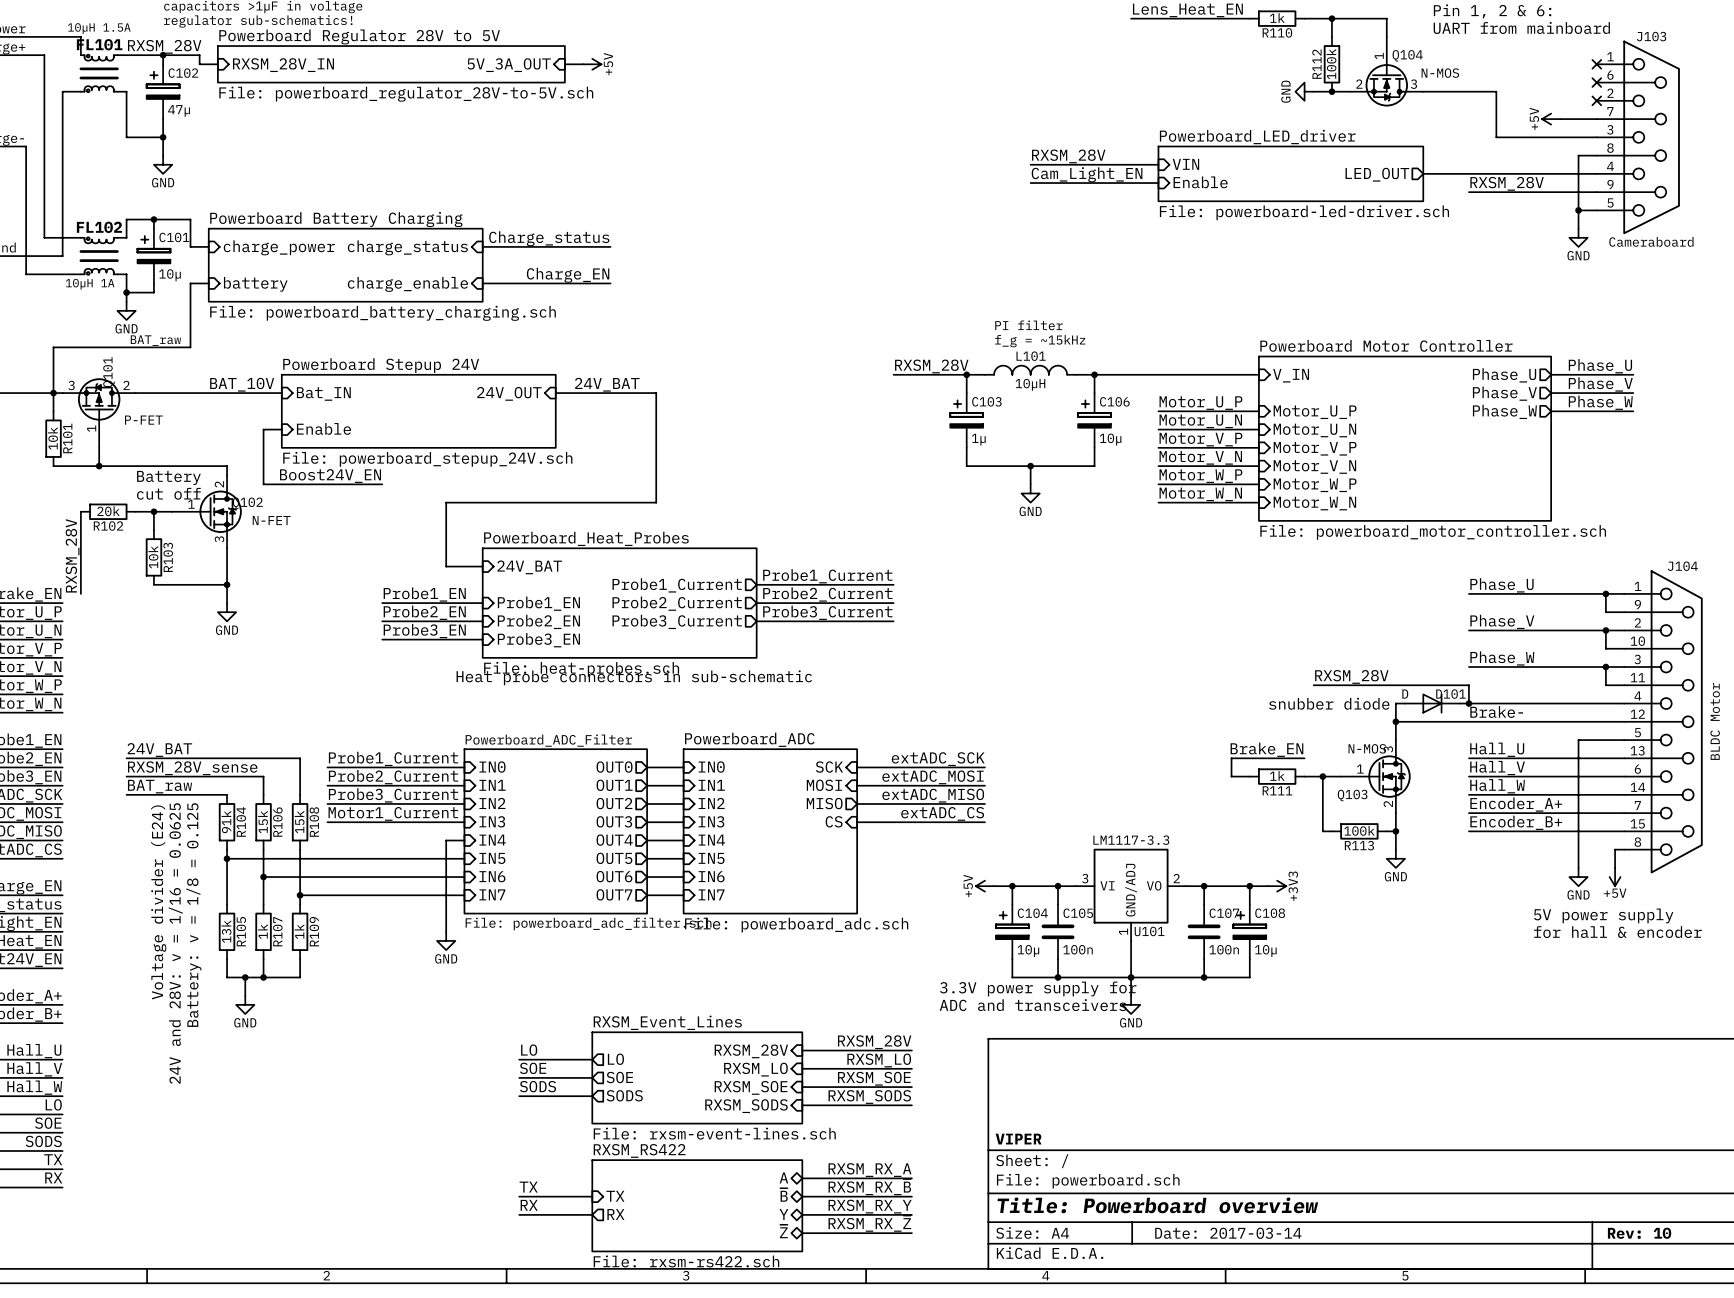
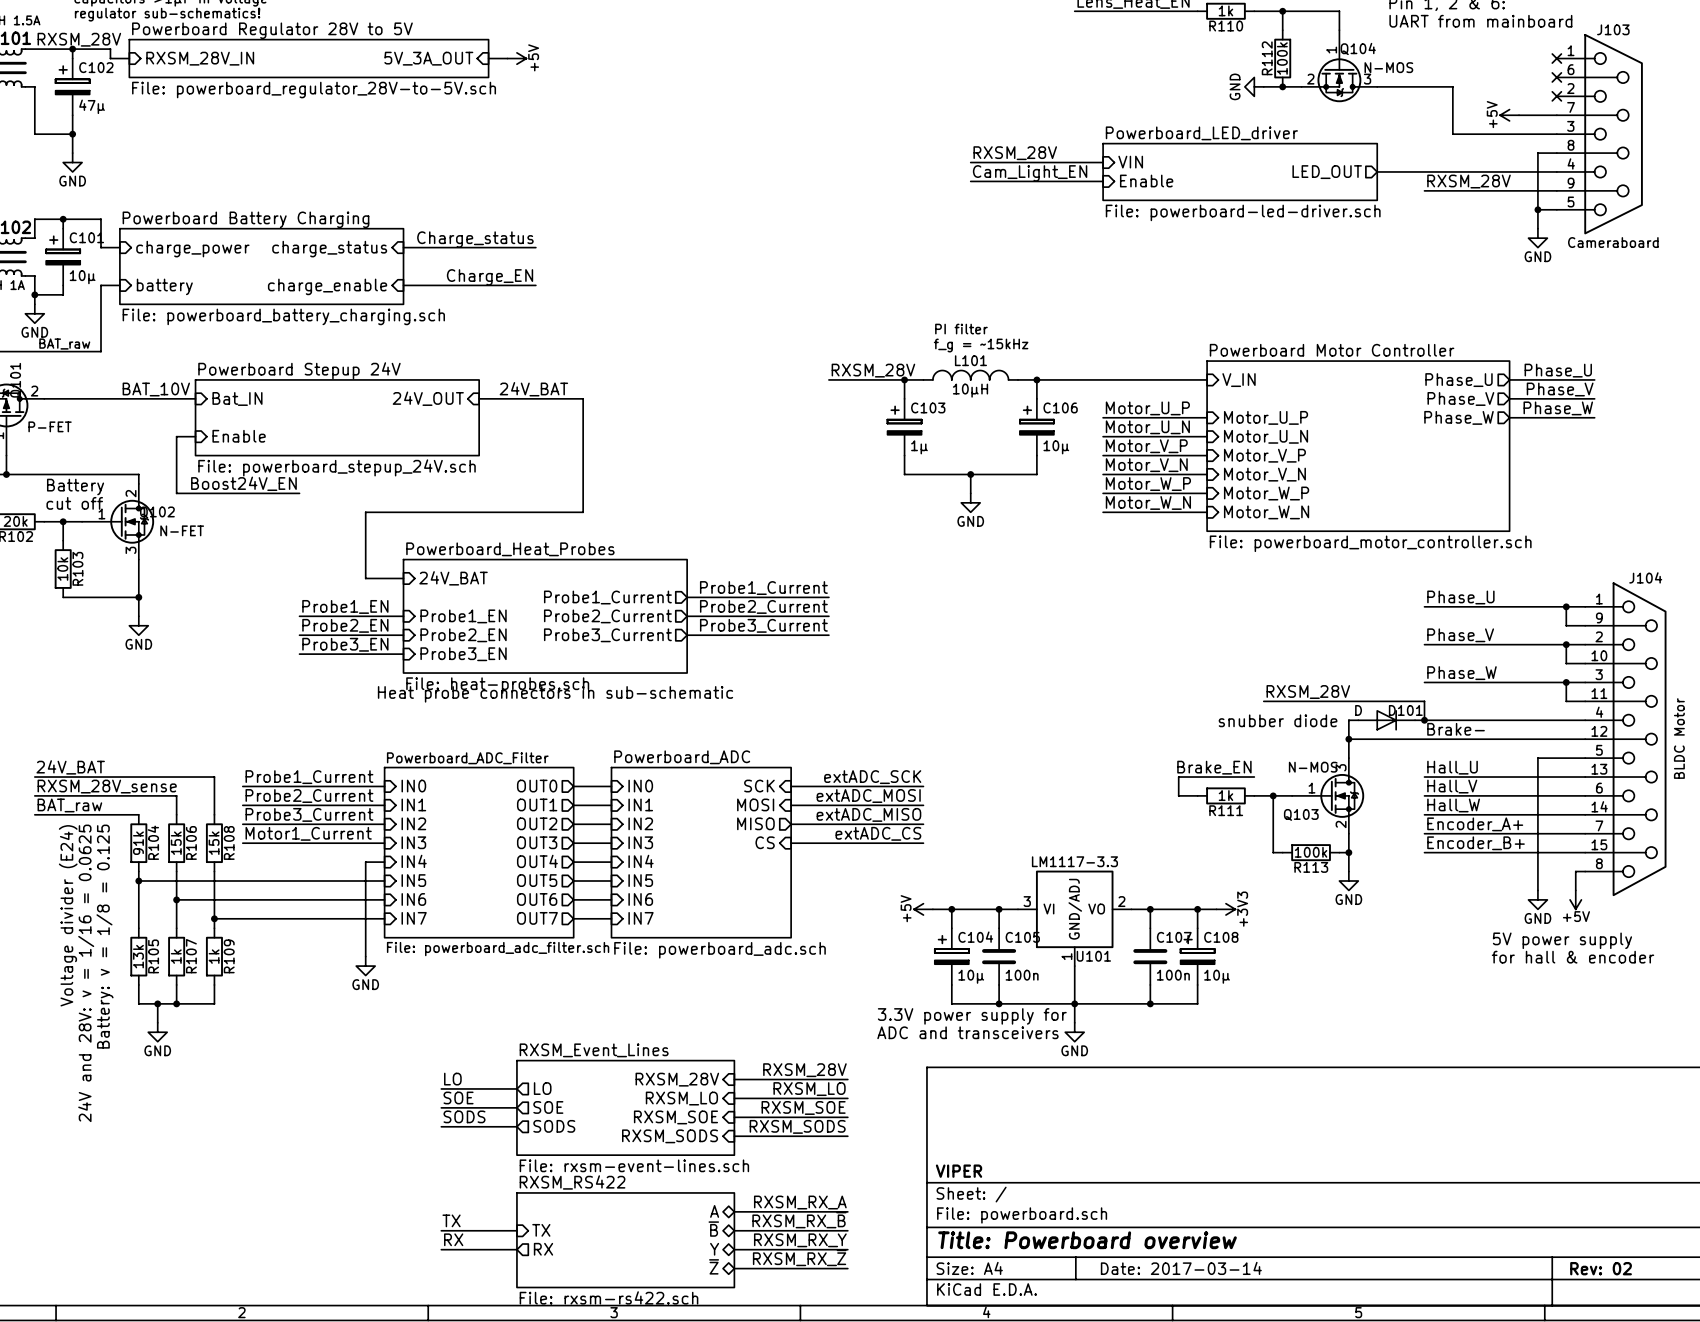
title block: Rev: 10 (1639, 1233) -> Rev: 02 (1601, 1268)

